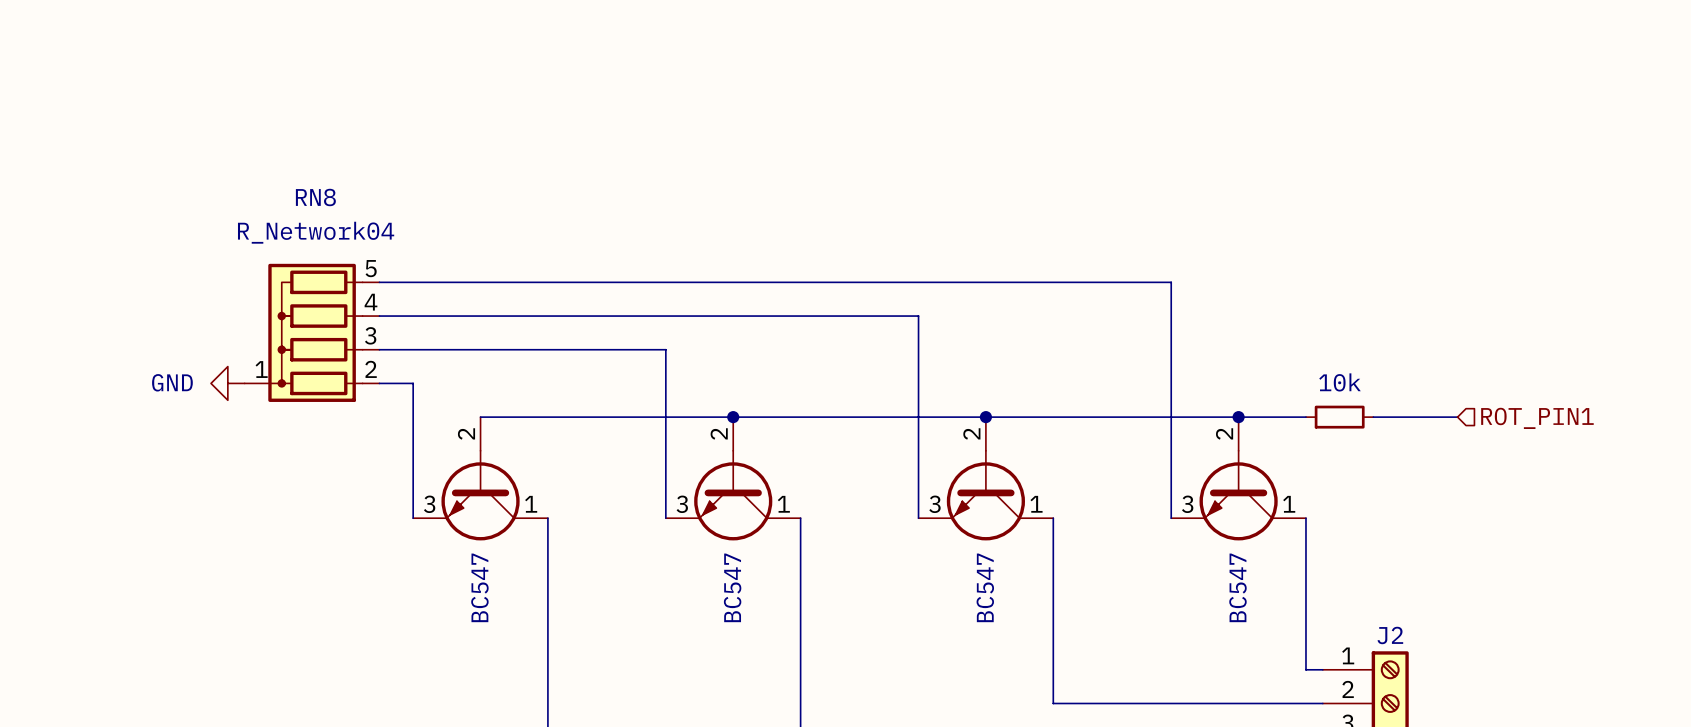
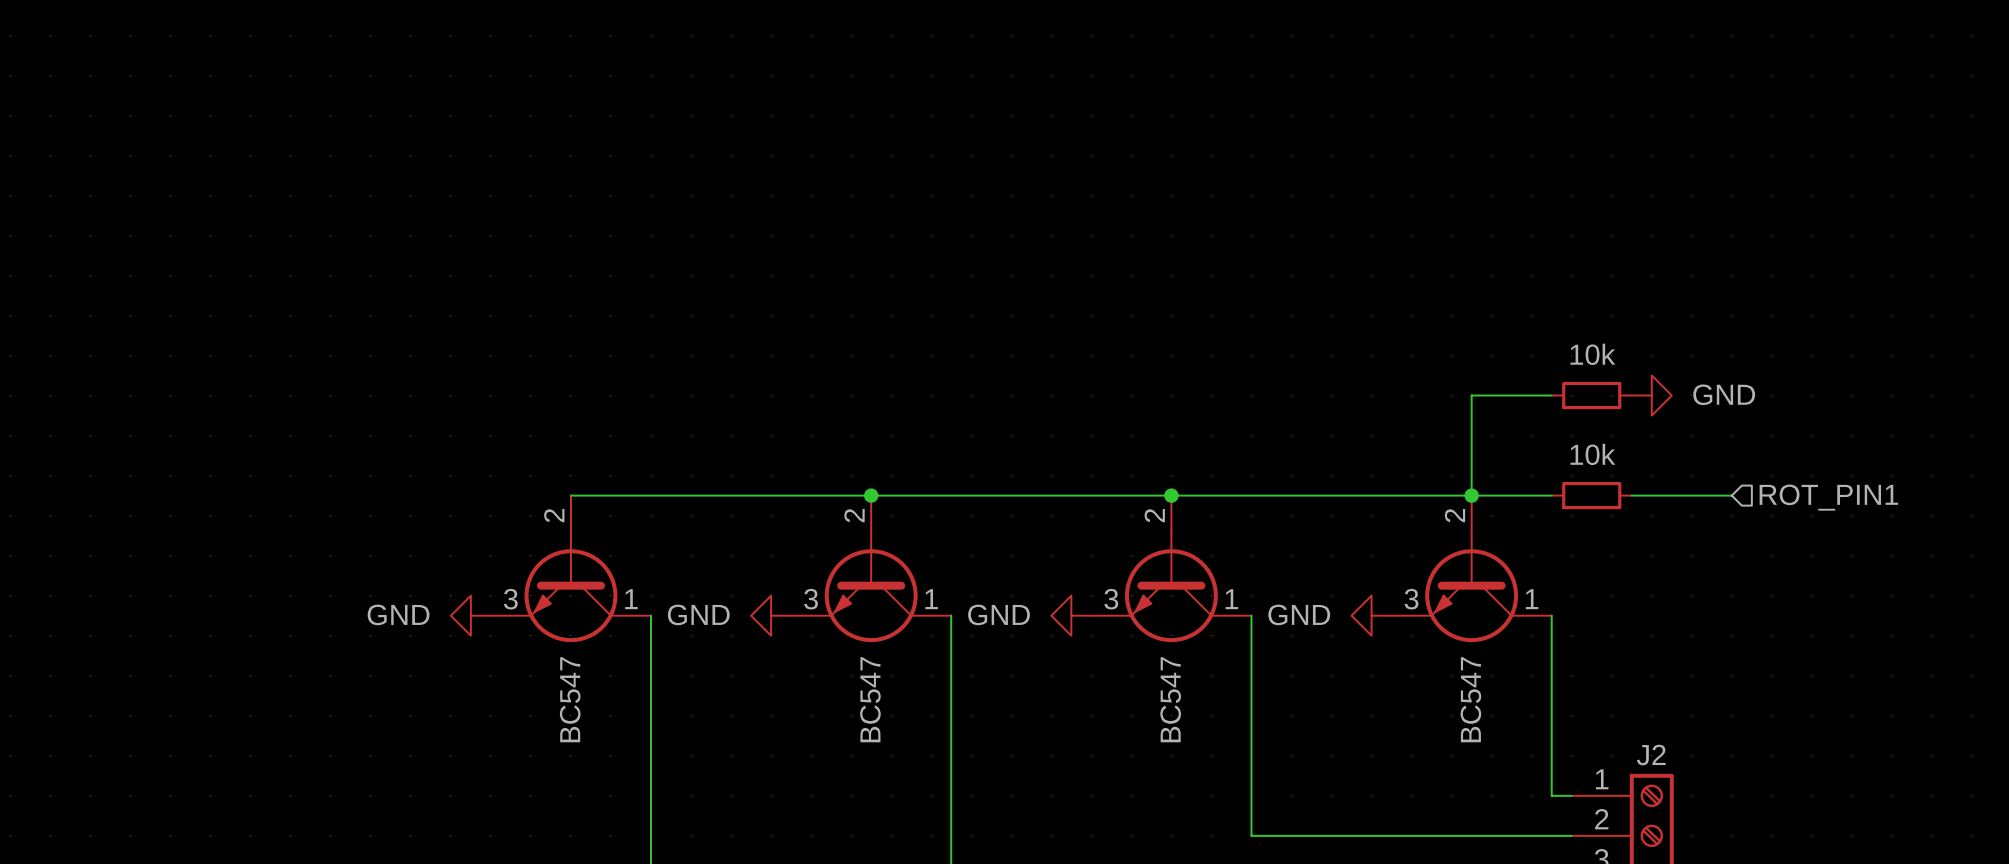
wire: (379, 282) (1171, 282) (1171, 518) -> none
wire: (379, 316) (918, 316) (918, 518) -> none
RN8: R_Network04 (312, 332) -> none
wire: none -> (1551, 395) (1471, 395) (1471, 495)
part: none -> 10k (1591, 395)
power symbol: none -> GND (1651, 395)
wire: (379, 349) (665, 349) (665, 518) -> none
power symbol position: GND (227, 383) -> GND (470, 615)
wire: (379, 383) (413, 383) (413, 518) -> none
power symbol: none -> GND (771, 615)
power symbol: none -> GND (1071, 615)
power symbol: none -> GND (1371, 615)

